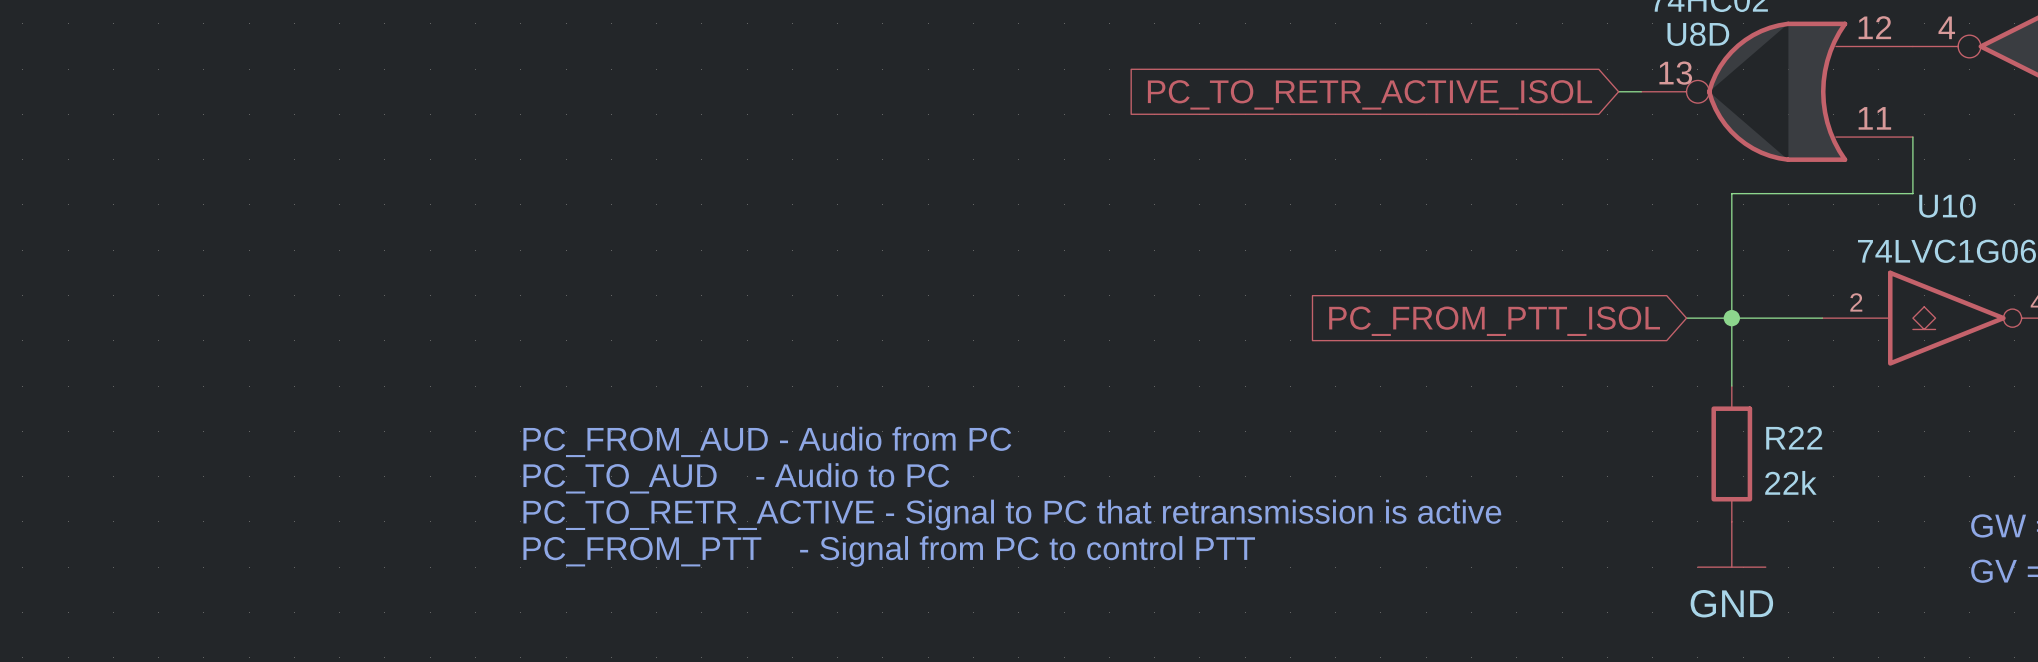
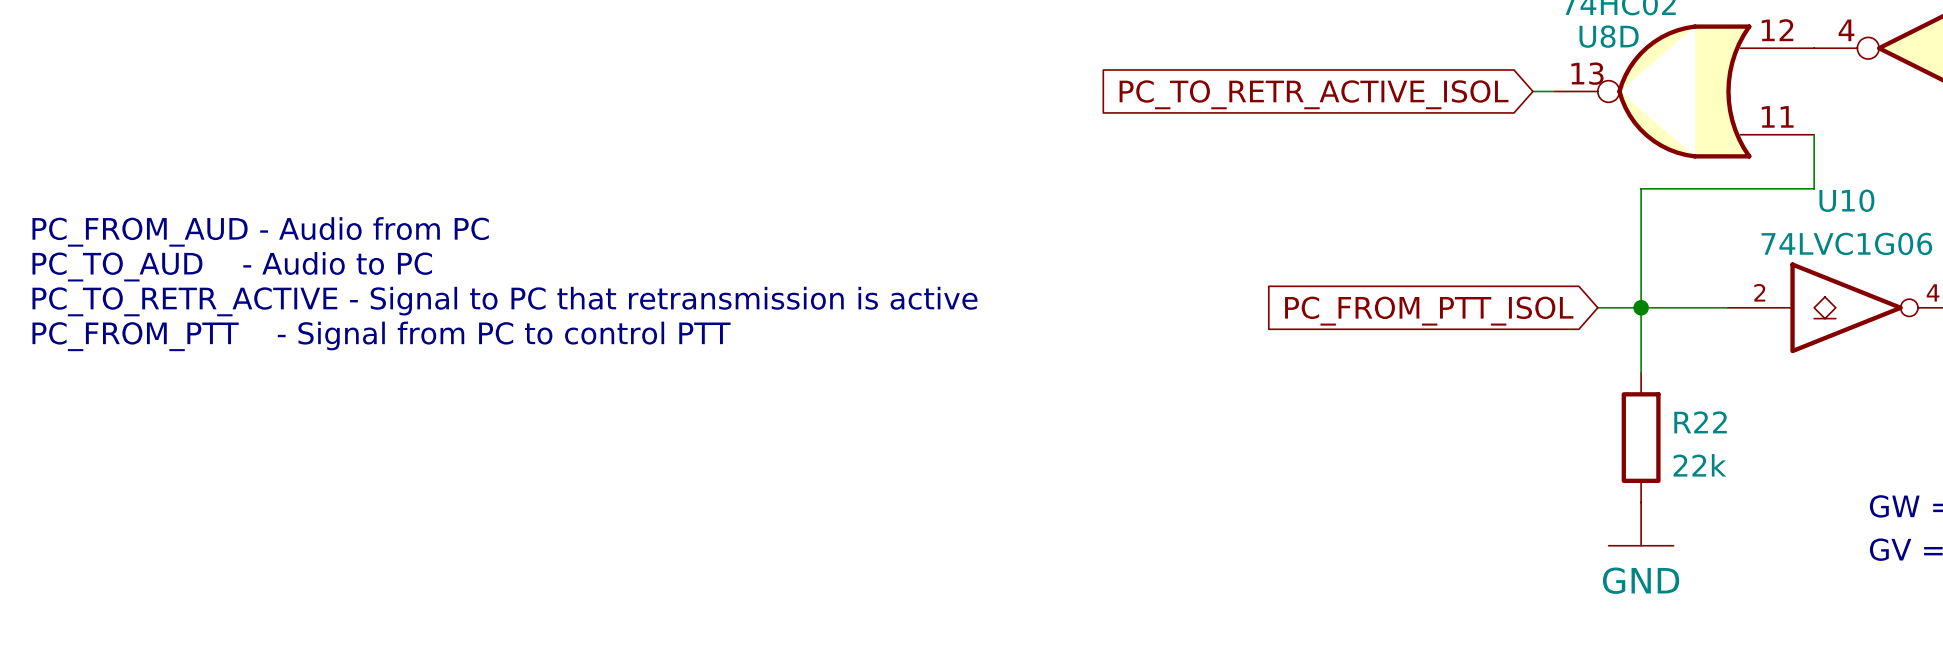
text: none -> PC_FROM_AUD - Audio from PC (260, 231)
text: none -> PC_TO_AUD - Audio to PC (232, 266)
text: none -> PC_TO_RETR_ACTIVE - Signal to PC that retransmission is active (504, 301)
text: none -> PC_FROM_PTT - Signal from PC to control PTT (381, 336)
text: PC_FROM_AUD - Audio from PC (767, 441) -> none
text: PC_TO_AUD - Audio to PC (736, 478) -> none
text: PC_TO_RETR_ACTIVE - Signal to PC that retransmission is active (1012, 514) -> none
text: PC_FROM_PTT - Signal from PC to control PTT (889, 551) -> none

